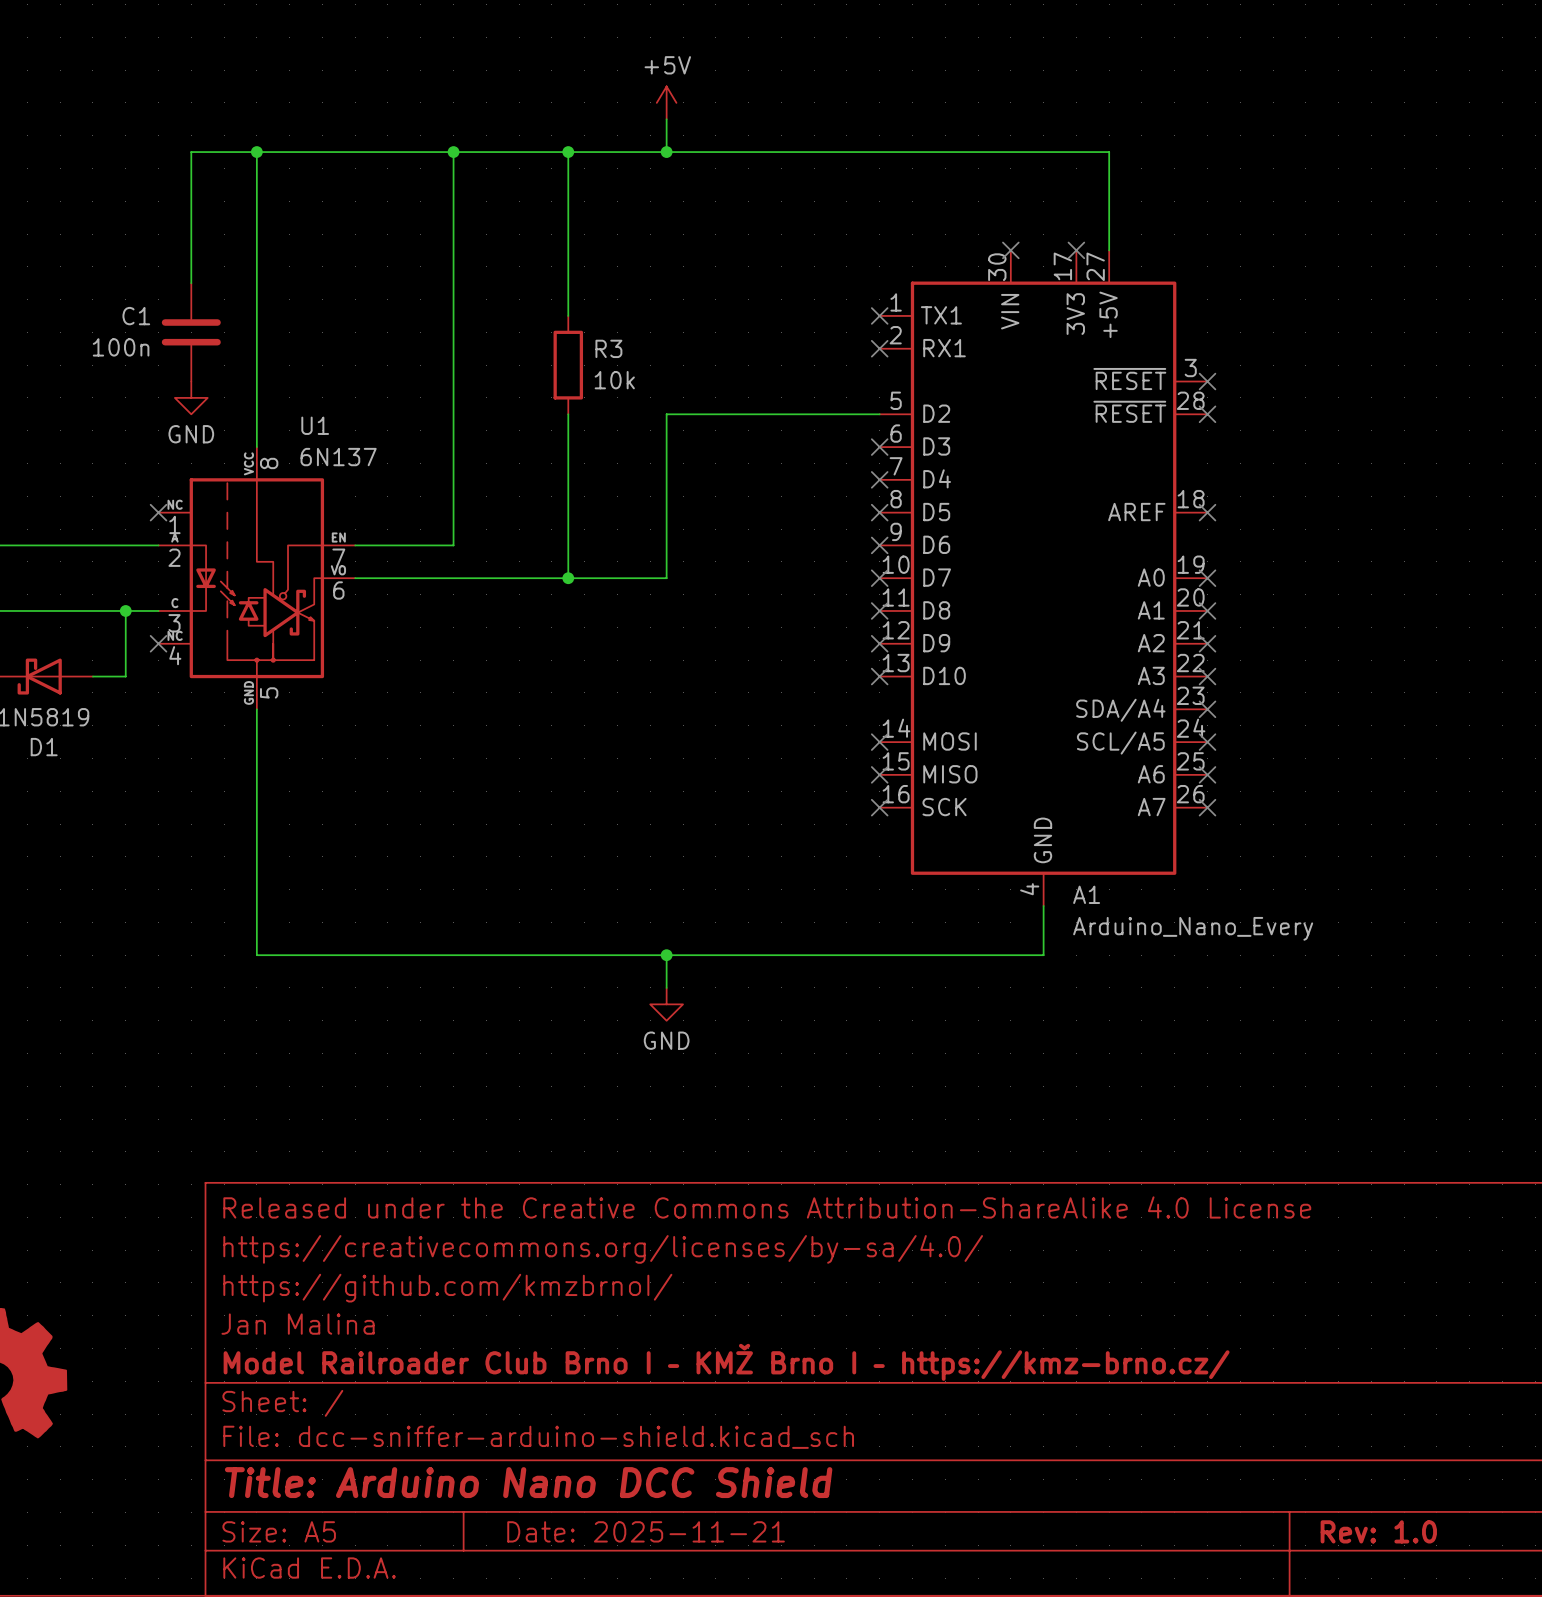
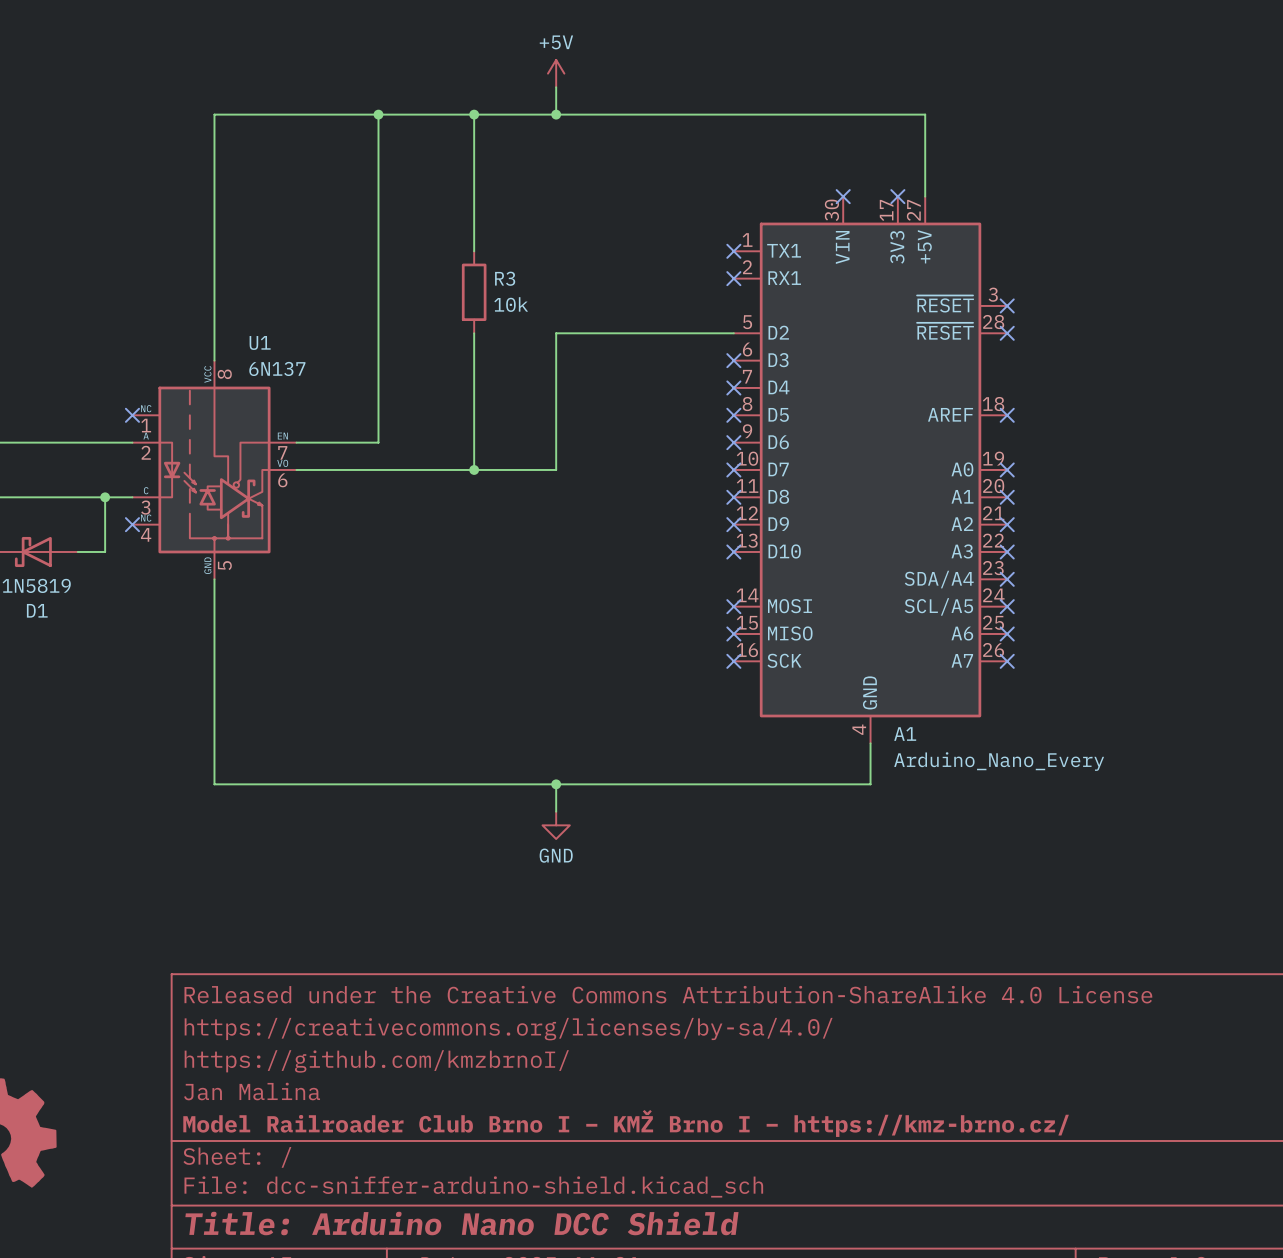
wire: (256, 152) (191, 152) (191, 283) -> none
junction: (256, 152) -> none
C1: 100n (191, 332) -> none
power symbol: GND (191, 397) -> none

